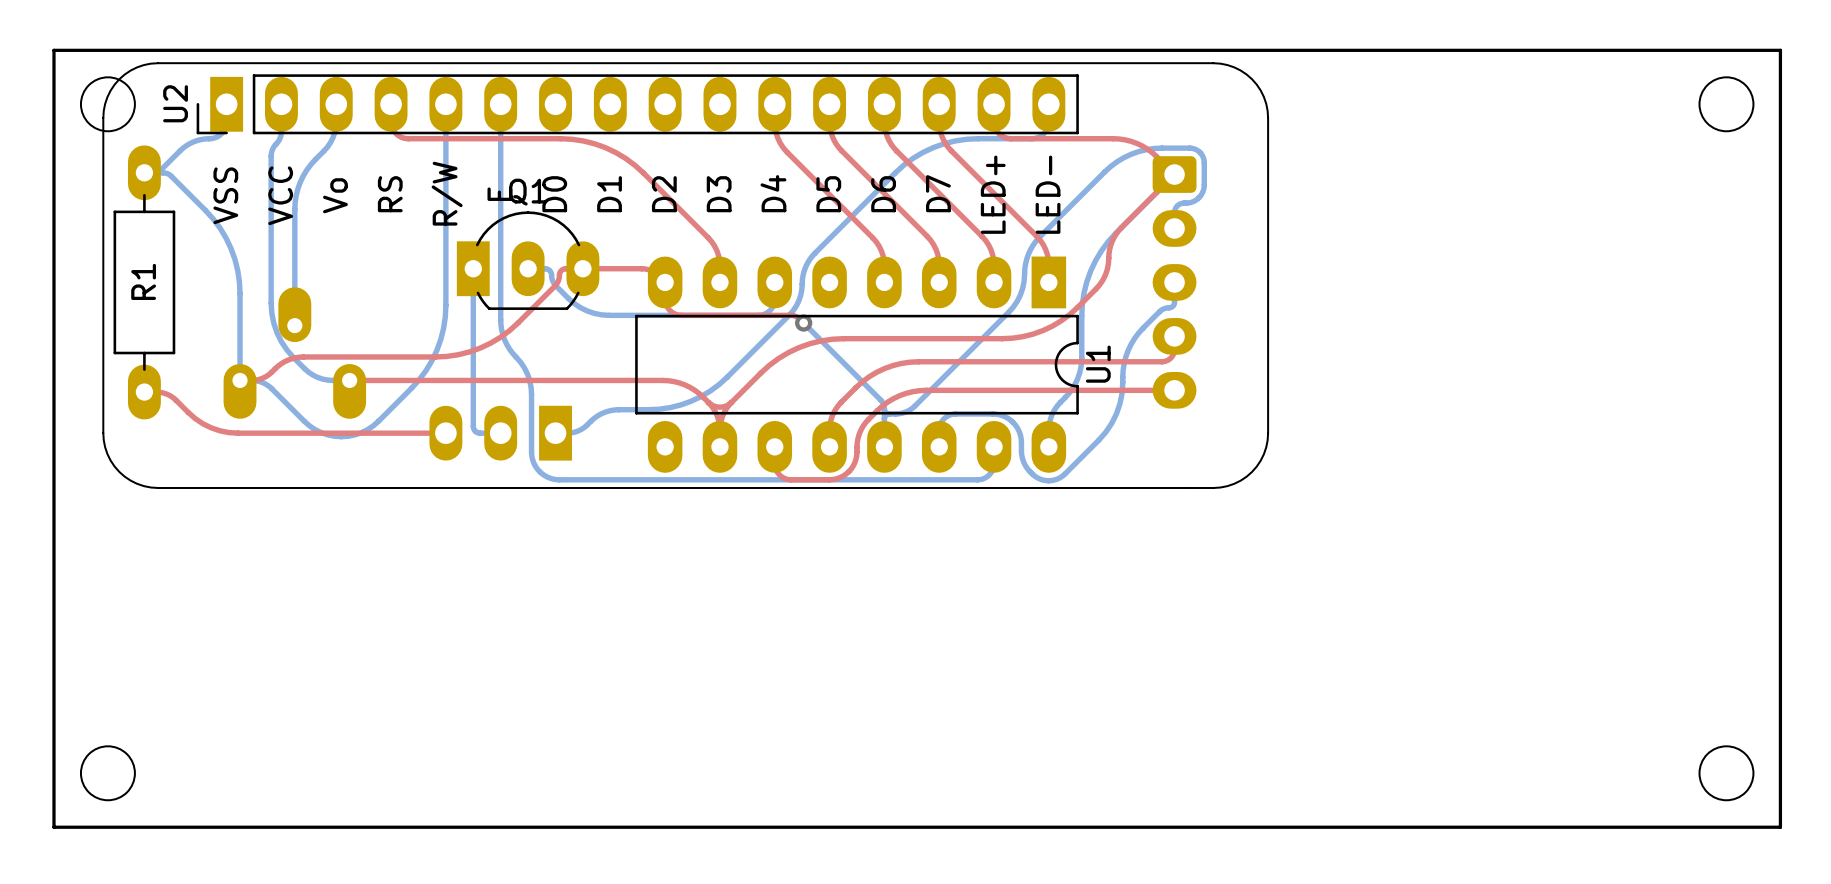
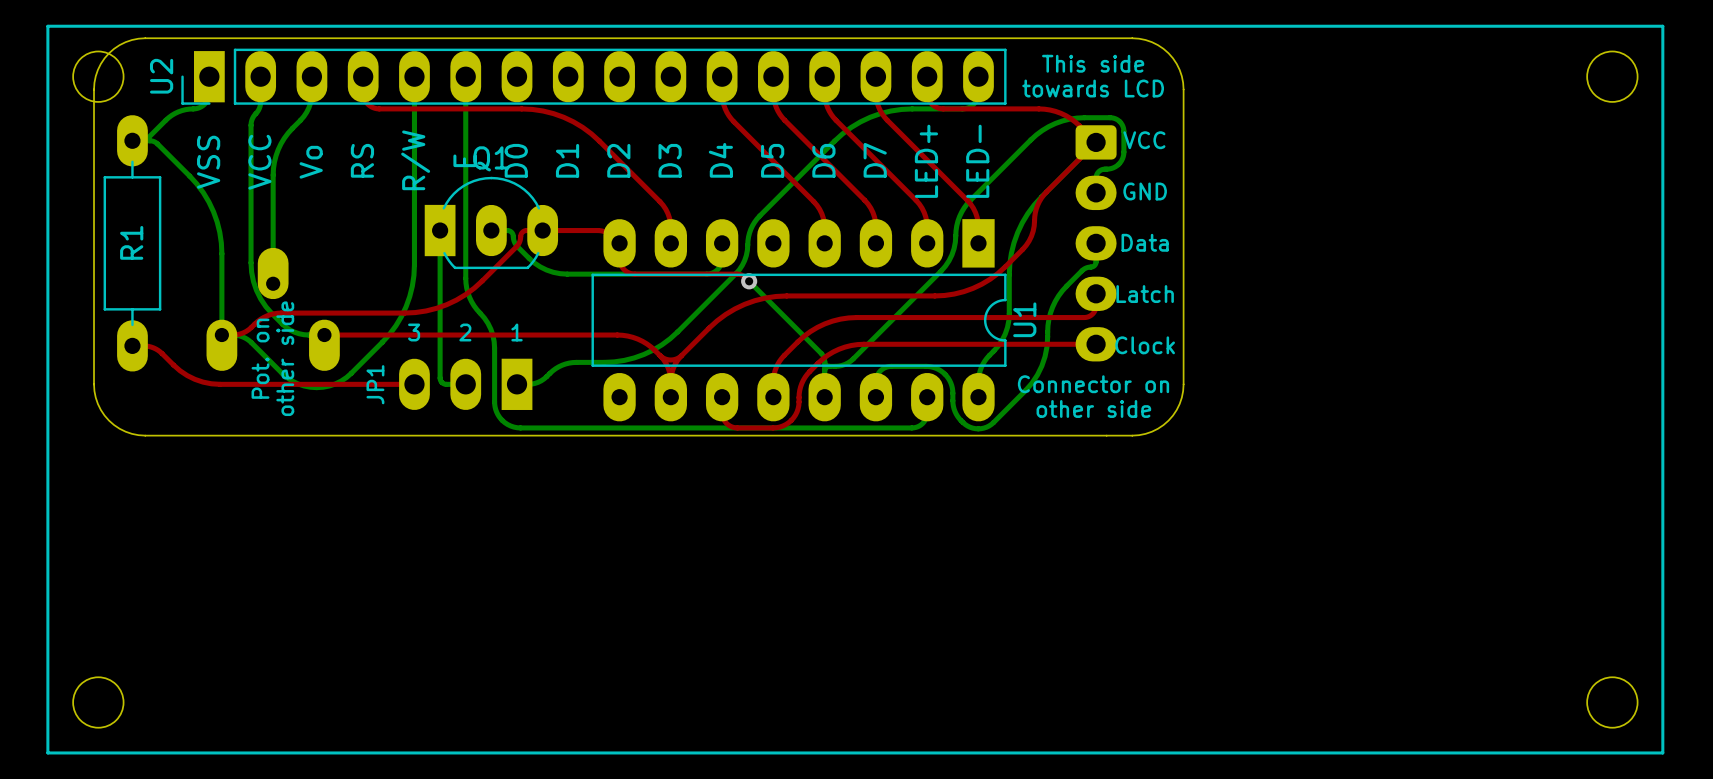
text: none -> This side (1093, 63)
text: none -> towards LCD (1093, 88)
text: none -> VCC (1144, 140)
text: none -> GND (1145, 191)
text: none -> Data (1145, 242)
text: none -> Latch (1145, 294)
text: none -> 3 (414, 332)
text: none -> 2 (465, 332)
text: none -> 1 (517, 332)
text: none -> Clock (1145, 345)
text: none -> Pot. on (260, 358)
text: none -> other side (285, 358)
text: none -> JP1 (375, 384)
text: none -> Connector on (1093, 384)
text: none -> other side (1093, 408)

